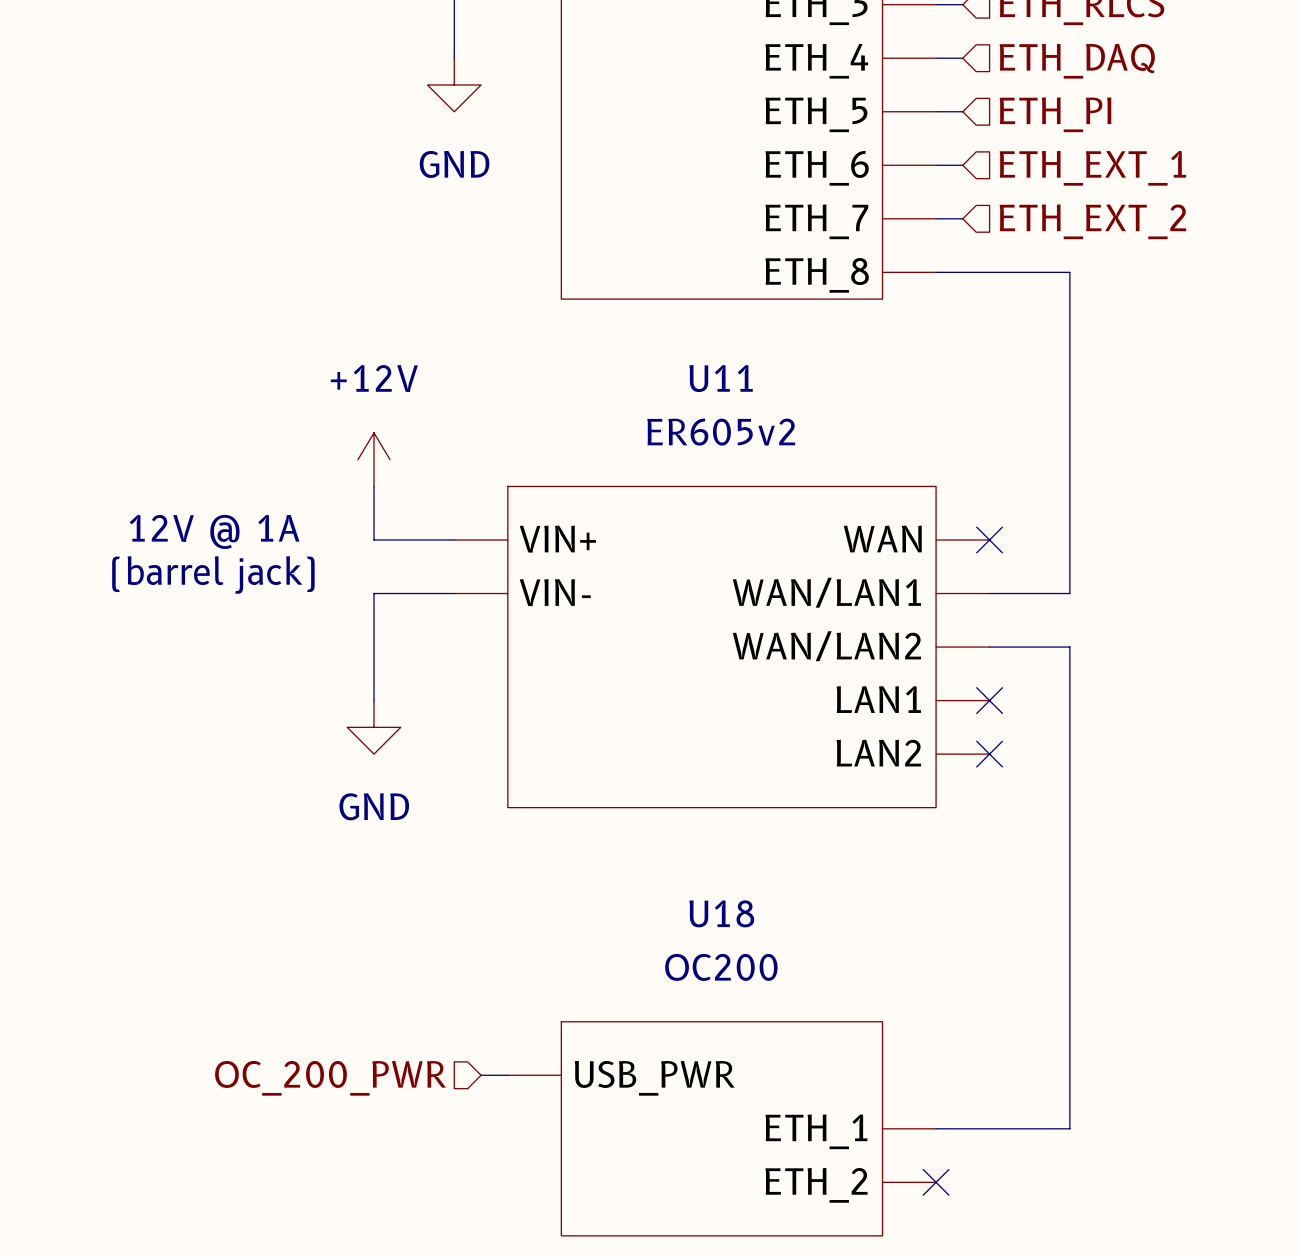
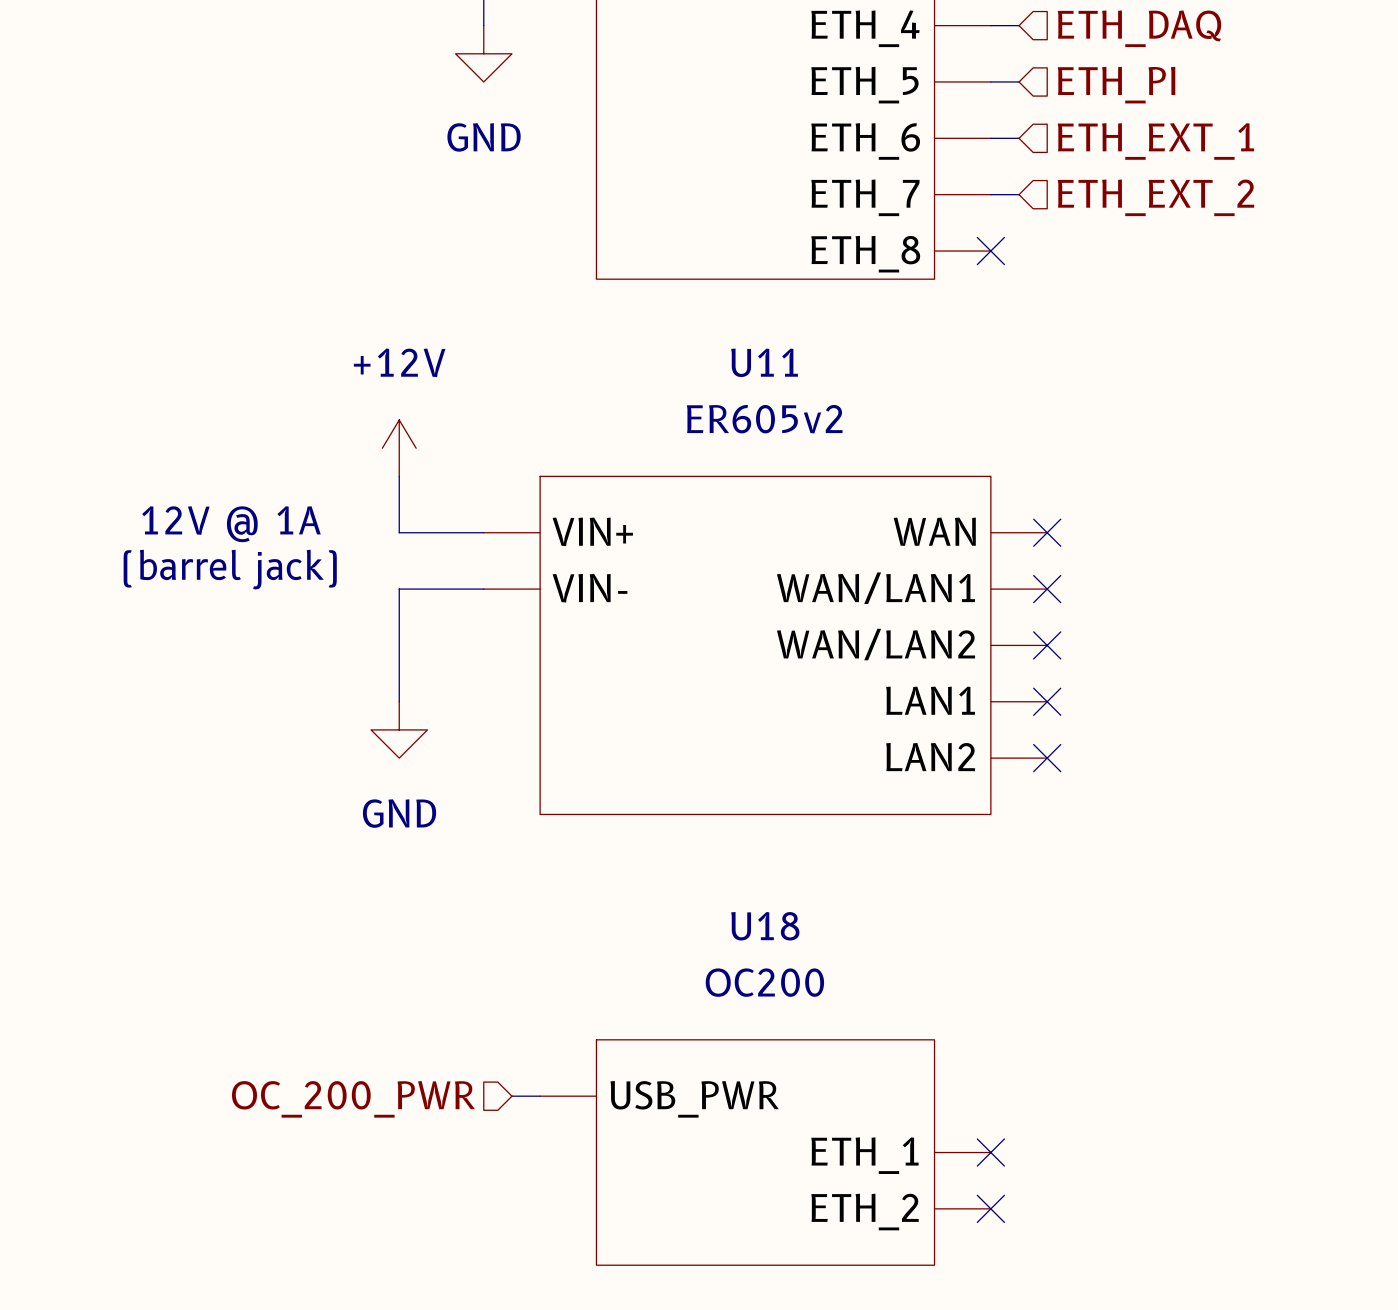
wire: (936, 272) (1069, 272) (1069, 593) (989, 593) -> none
no-connect mark: none -> (990, 251)
no-connect mark: none -> (1047, 589)
wire: (989, 647) (1069, 647) (1069, 1128) (936, 1128) -> none
no-connect mark: none -> (1047, 645)
no-connect mark: none -> (990, 1152)

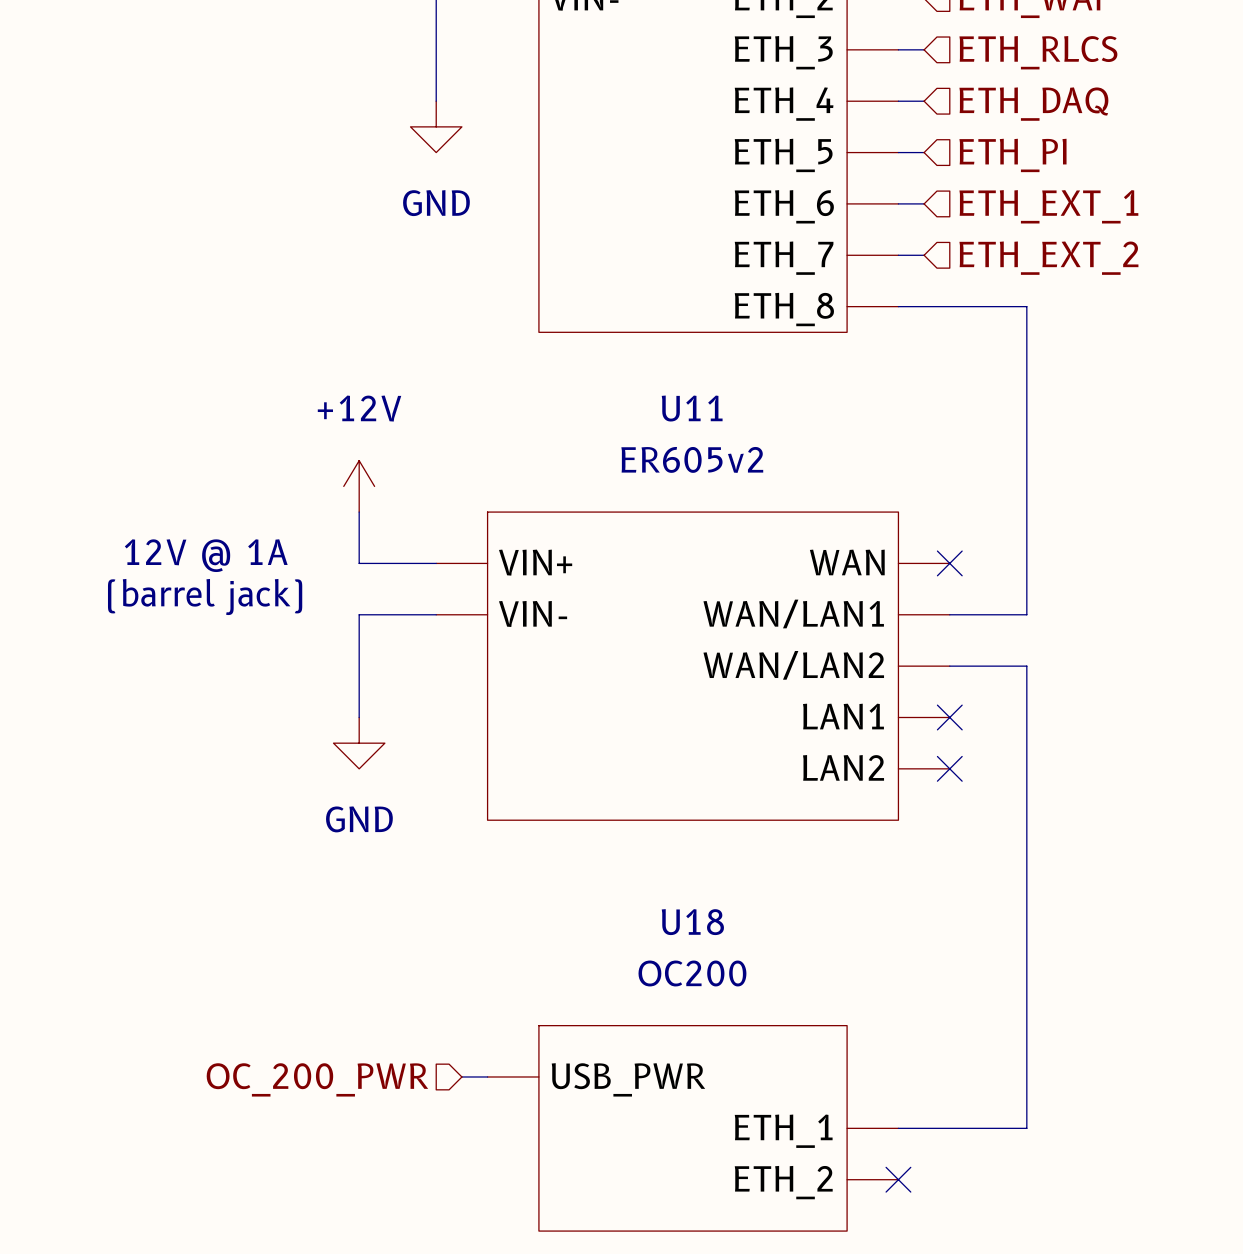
wire: none -> (898, 306) (1026, 306) (1026, 614) (949, 614)
no-connect mark: (990, 251) -> none
no-connect mark: (1047, 589) -> none
wire: none -> (949, 666) (1026, 666) (1026, 1128) (898, 1128)
no-connect mark: (1047, 645) -> none
no-connect mark: (990, 1152) -> none

